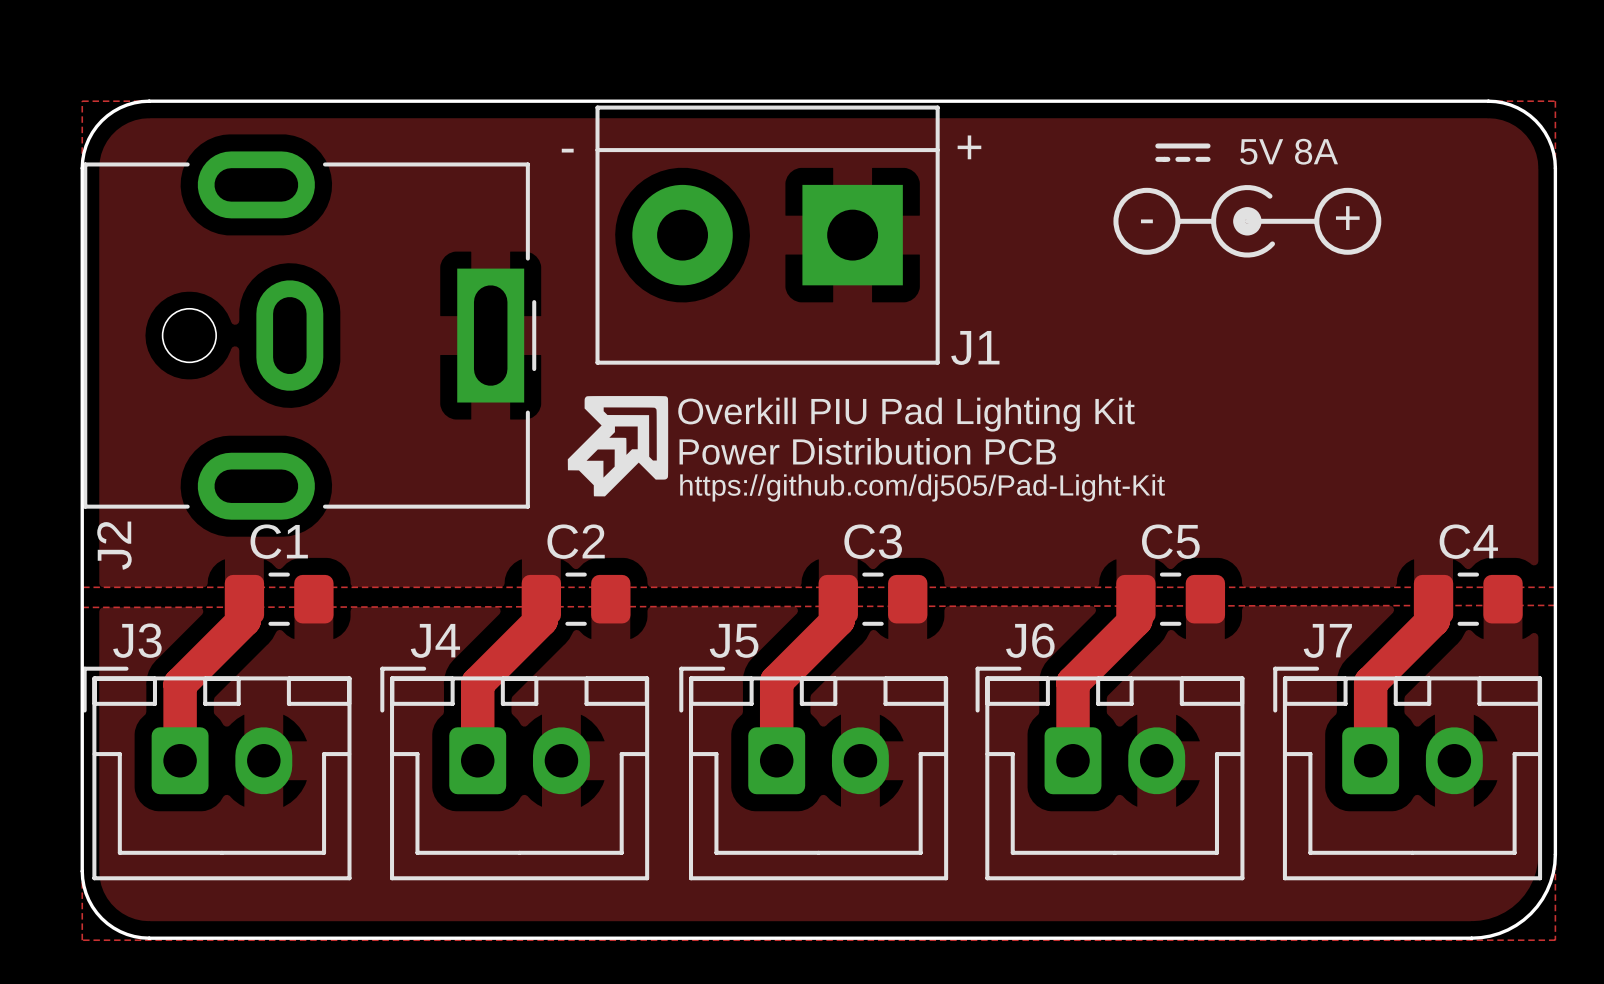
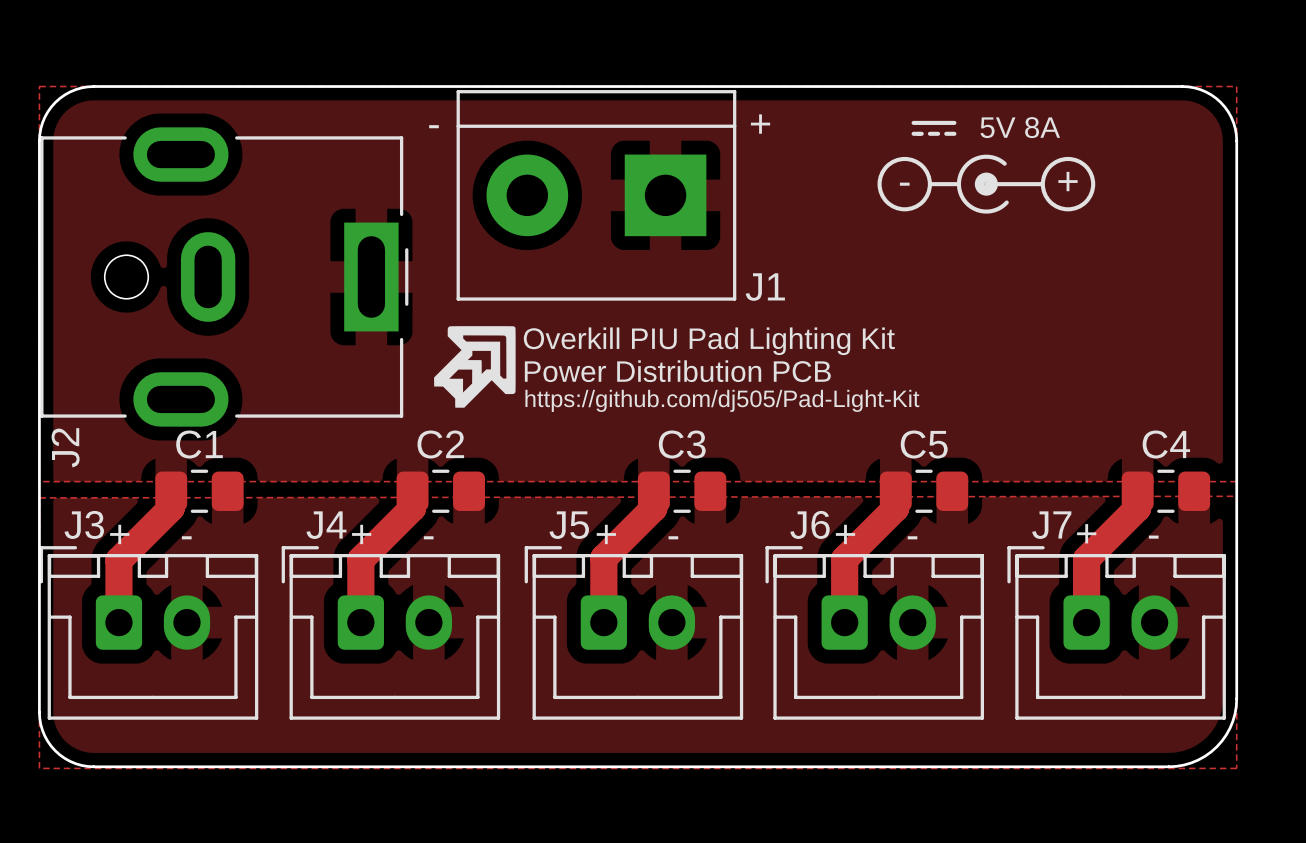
text: none -> + (1086, 533)
text: none -> + (119, 534)
text: none -> + (361, 534)
text: none -> + (606, 534)
text: none -> + (845, 534)
text: none -> - (1153, 537)
text: none -> - (186, 537)
text: none -> - (428, 537)
text: none -> - (673, 537)
text: none -> - (912, 537)

